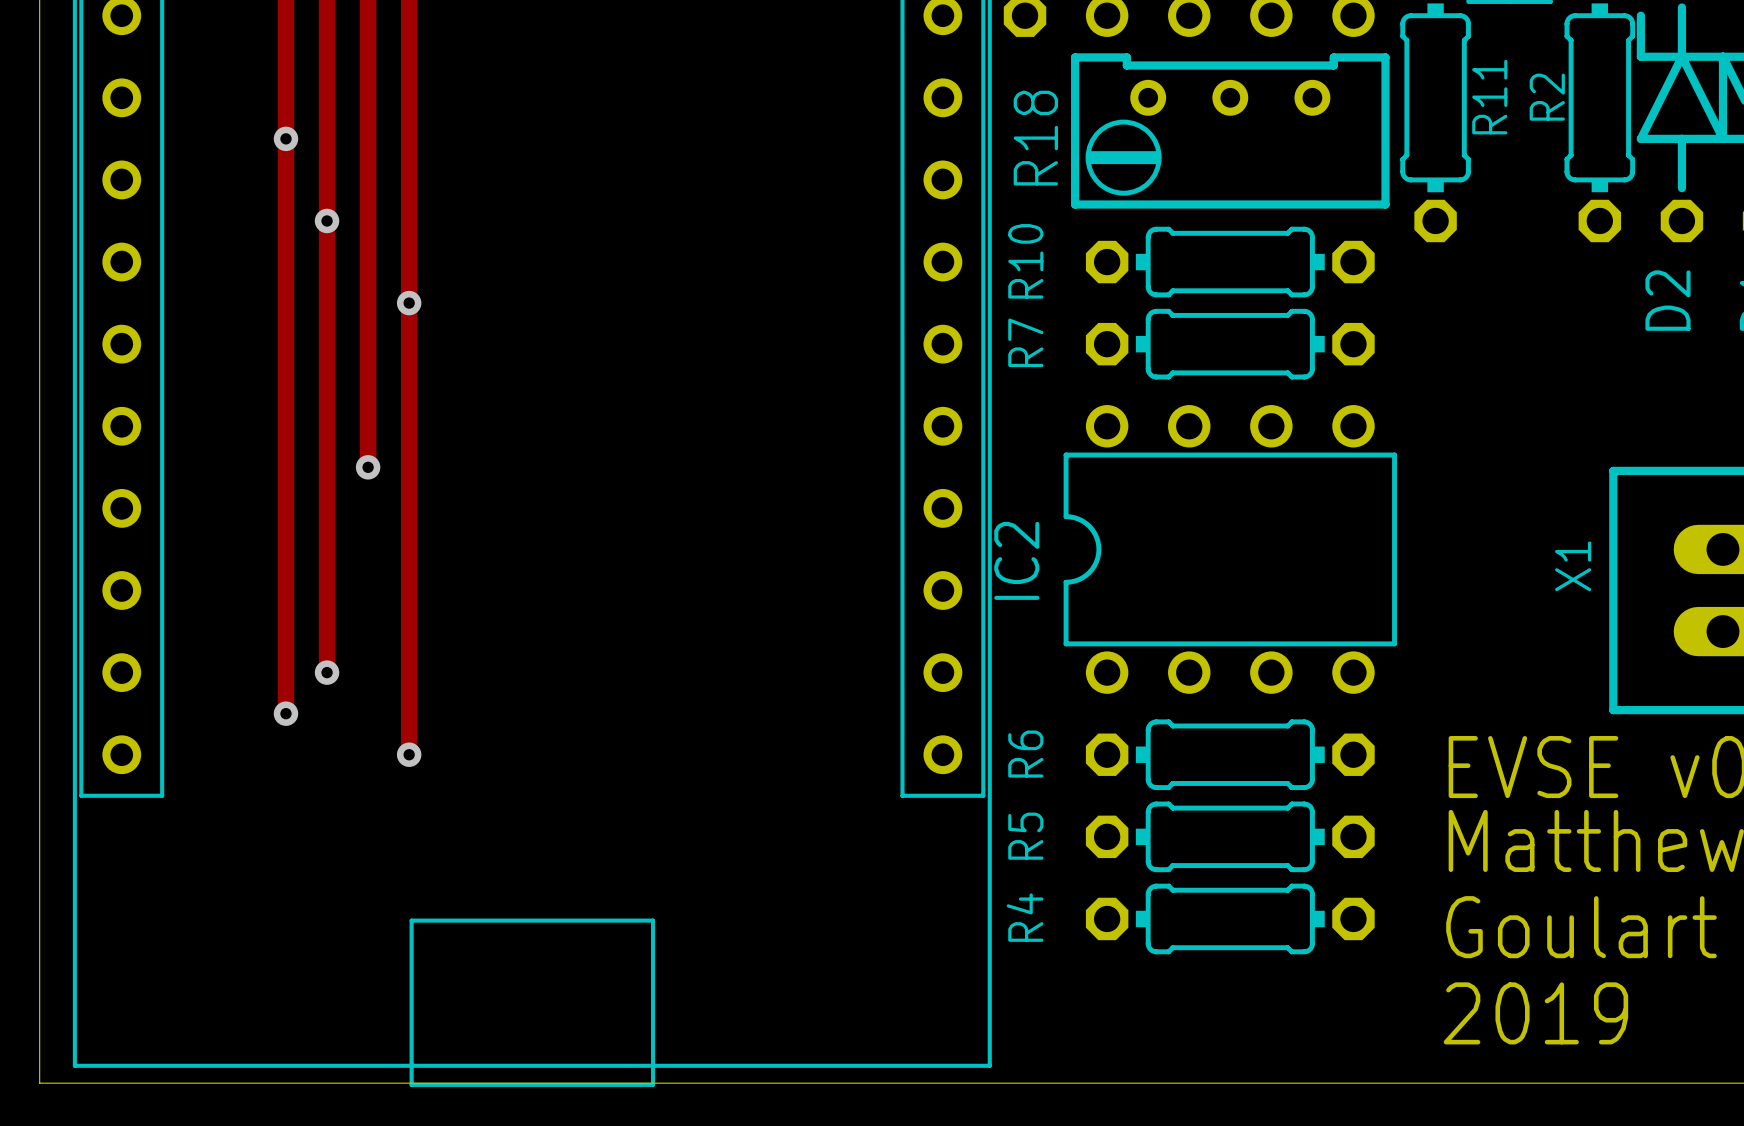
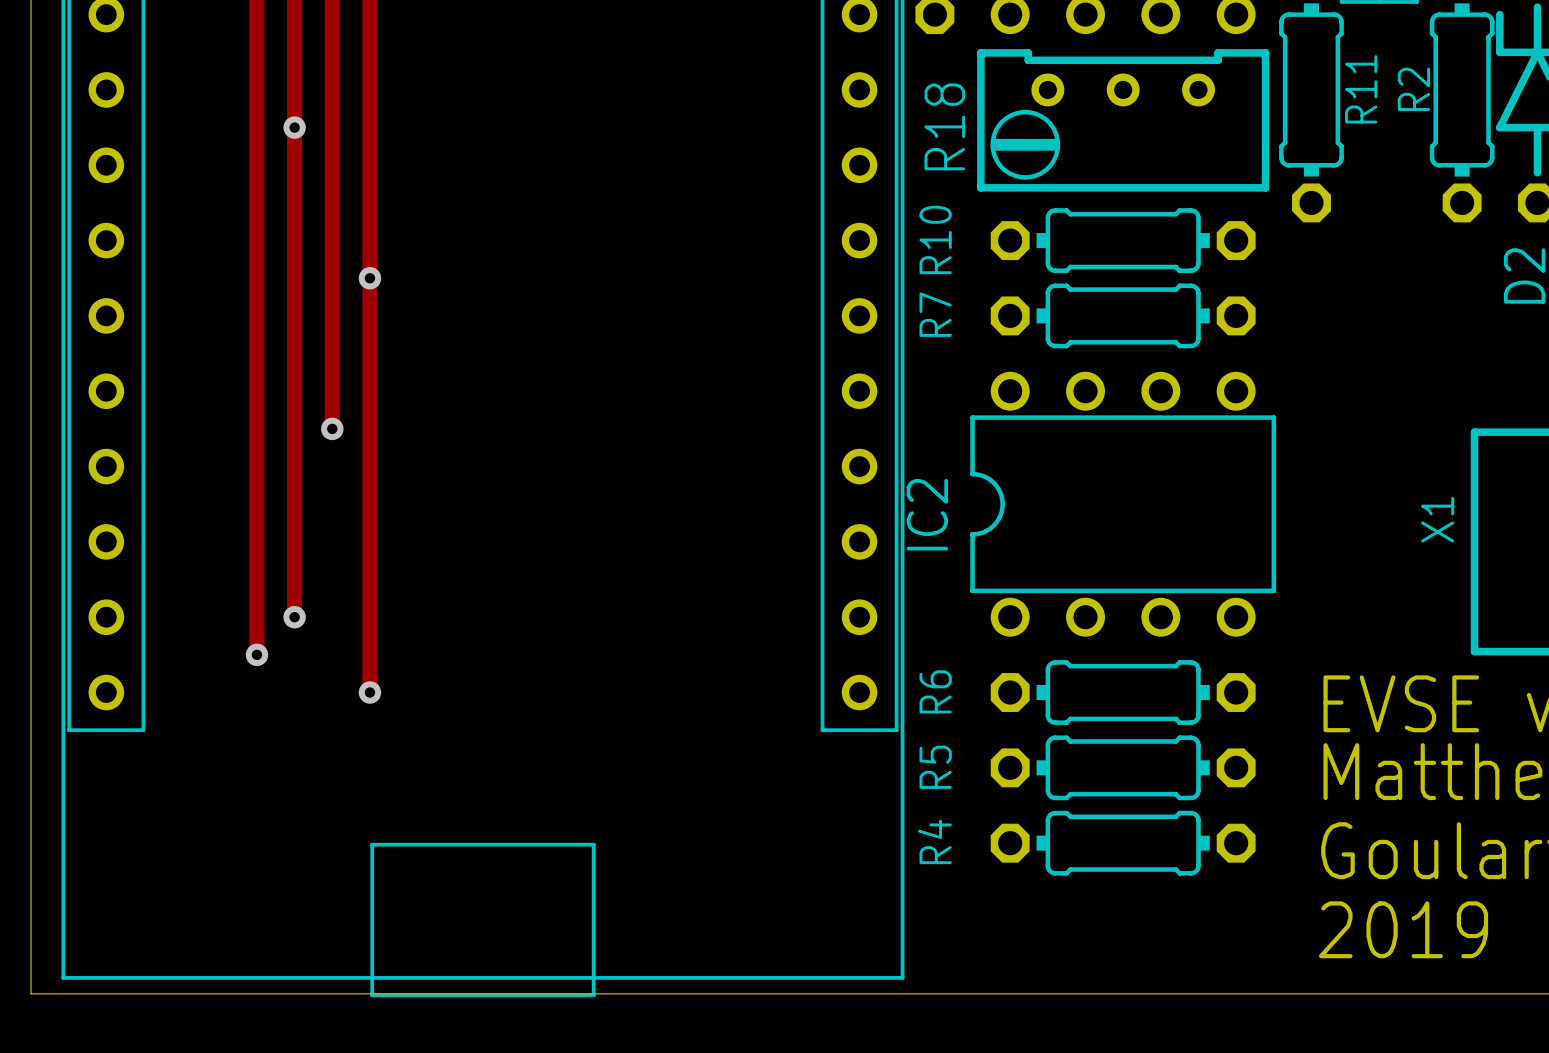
via: (285, 138) -> none
via: none -> (294, 127)
via: (327, 220) -> none

